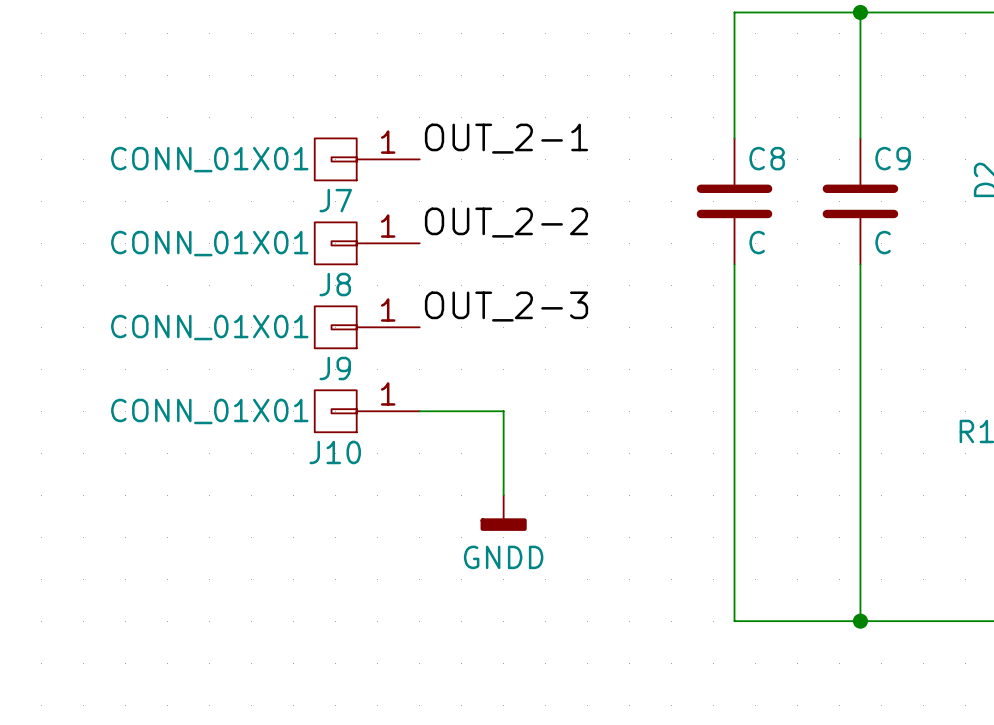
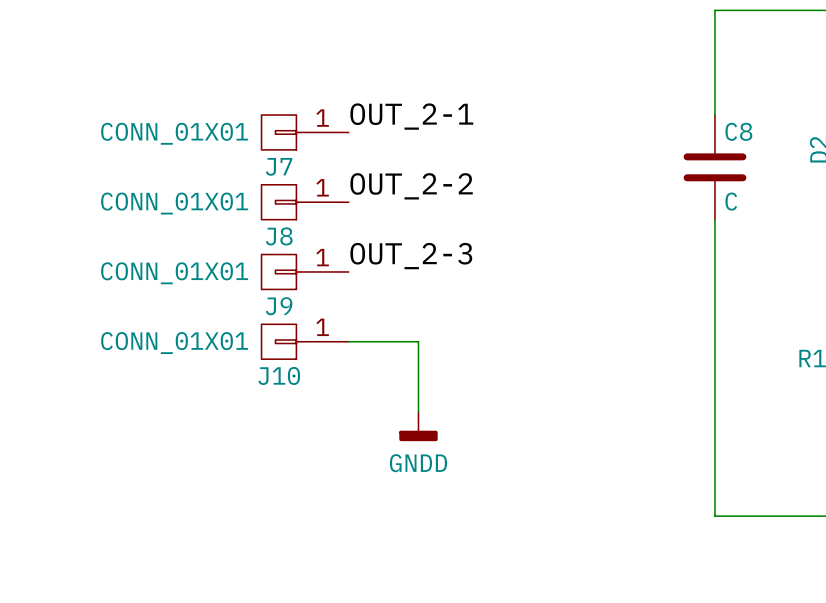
wire: (860, 12) (734, 12) (734, 138) -> none
junction: (860, 12) -> none
C9 name: C9 (893, 158) -> C8 (738, 131)
C8: C (734, 201) -> none
wire: (734, 264) (734, 621) (860, 621) -> none
junction: (860, 621) -> none

